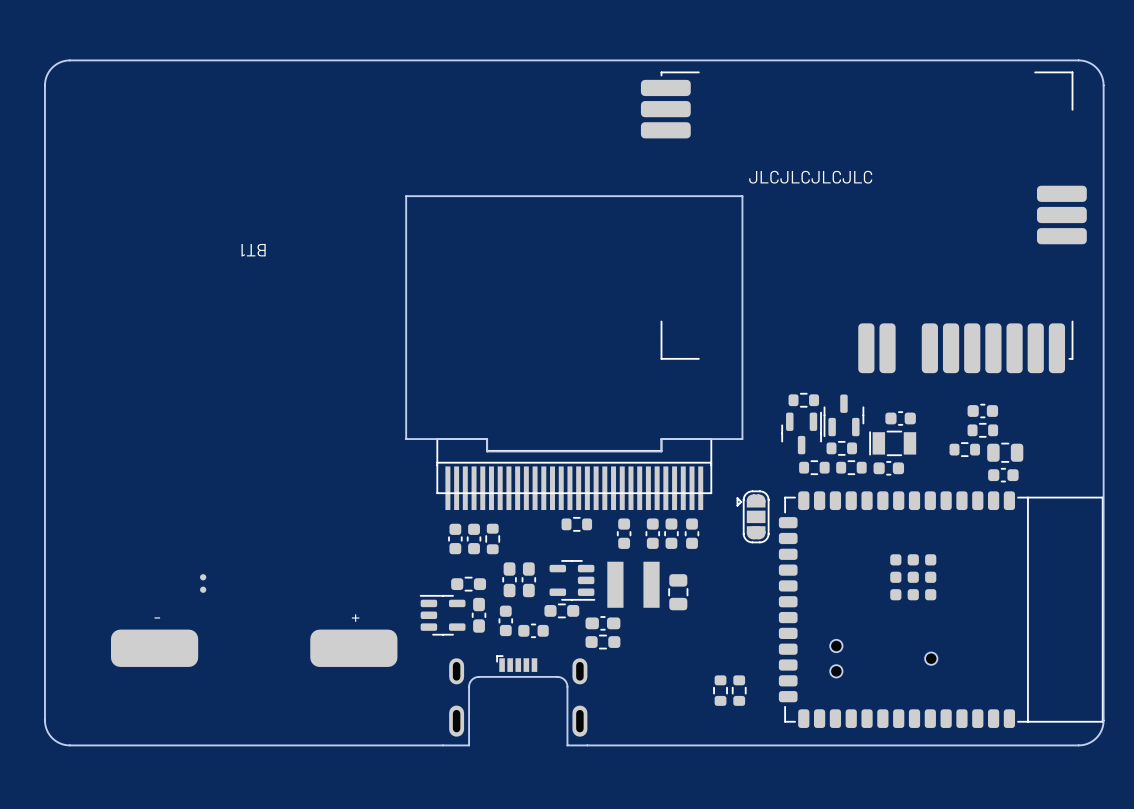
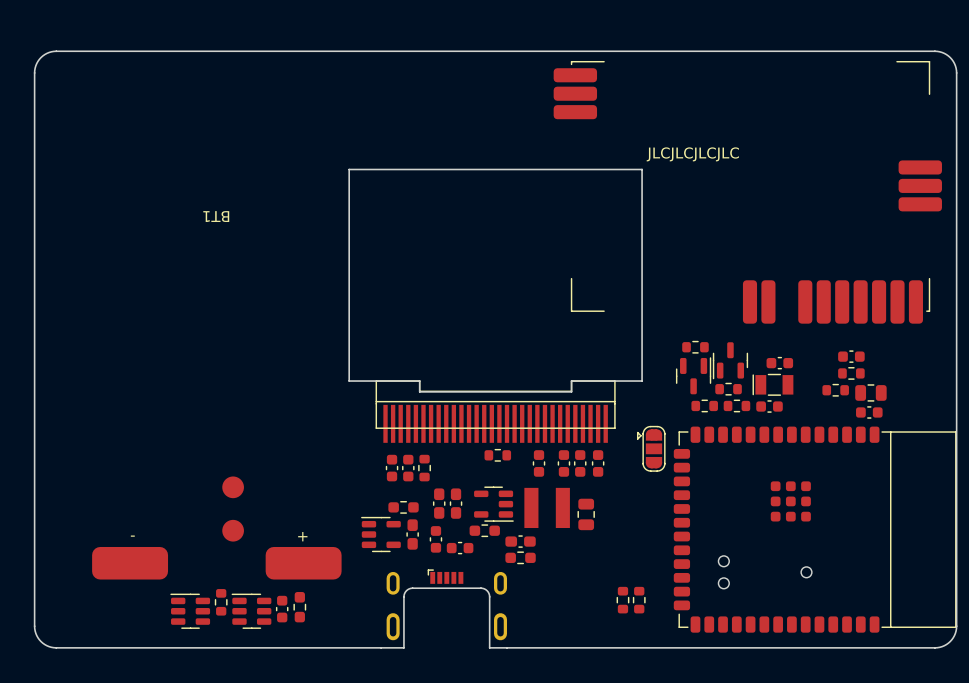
part: (203, 583) -> none
part: none -> (233, 509)
part: none -> (221, 602)
part: none -> (299, 607)
part: none -> (282, 609)
part: none -> (190, 611)
part: none -> (251, 611)

